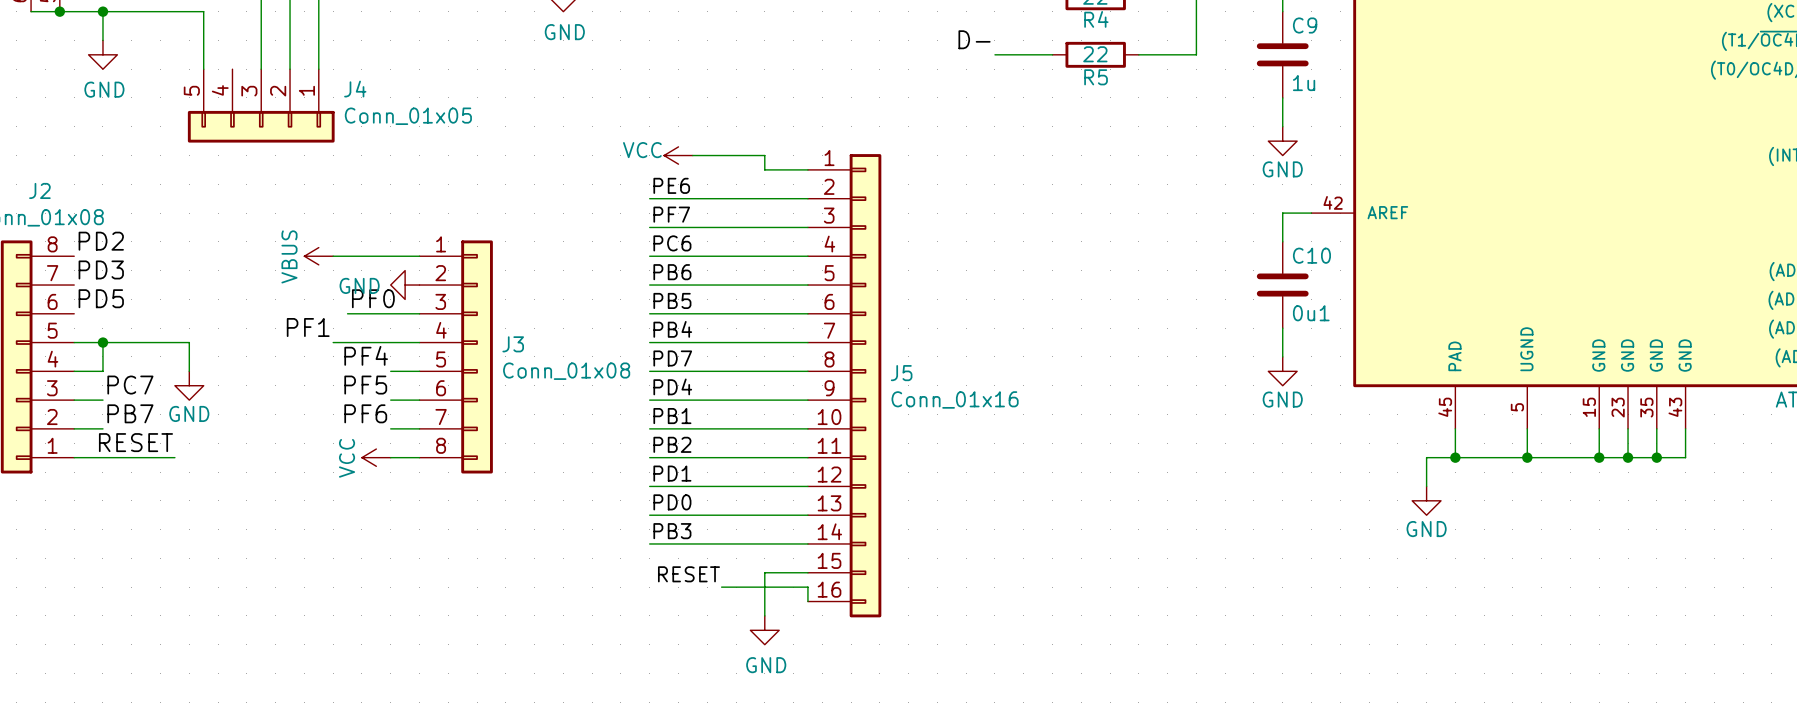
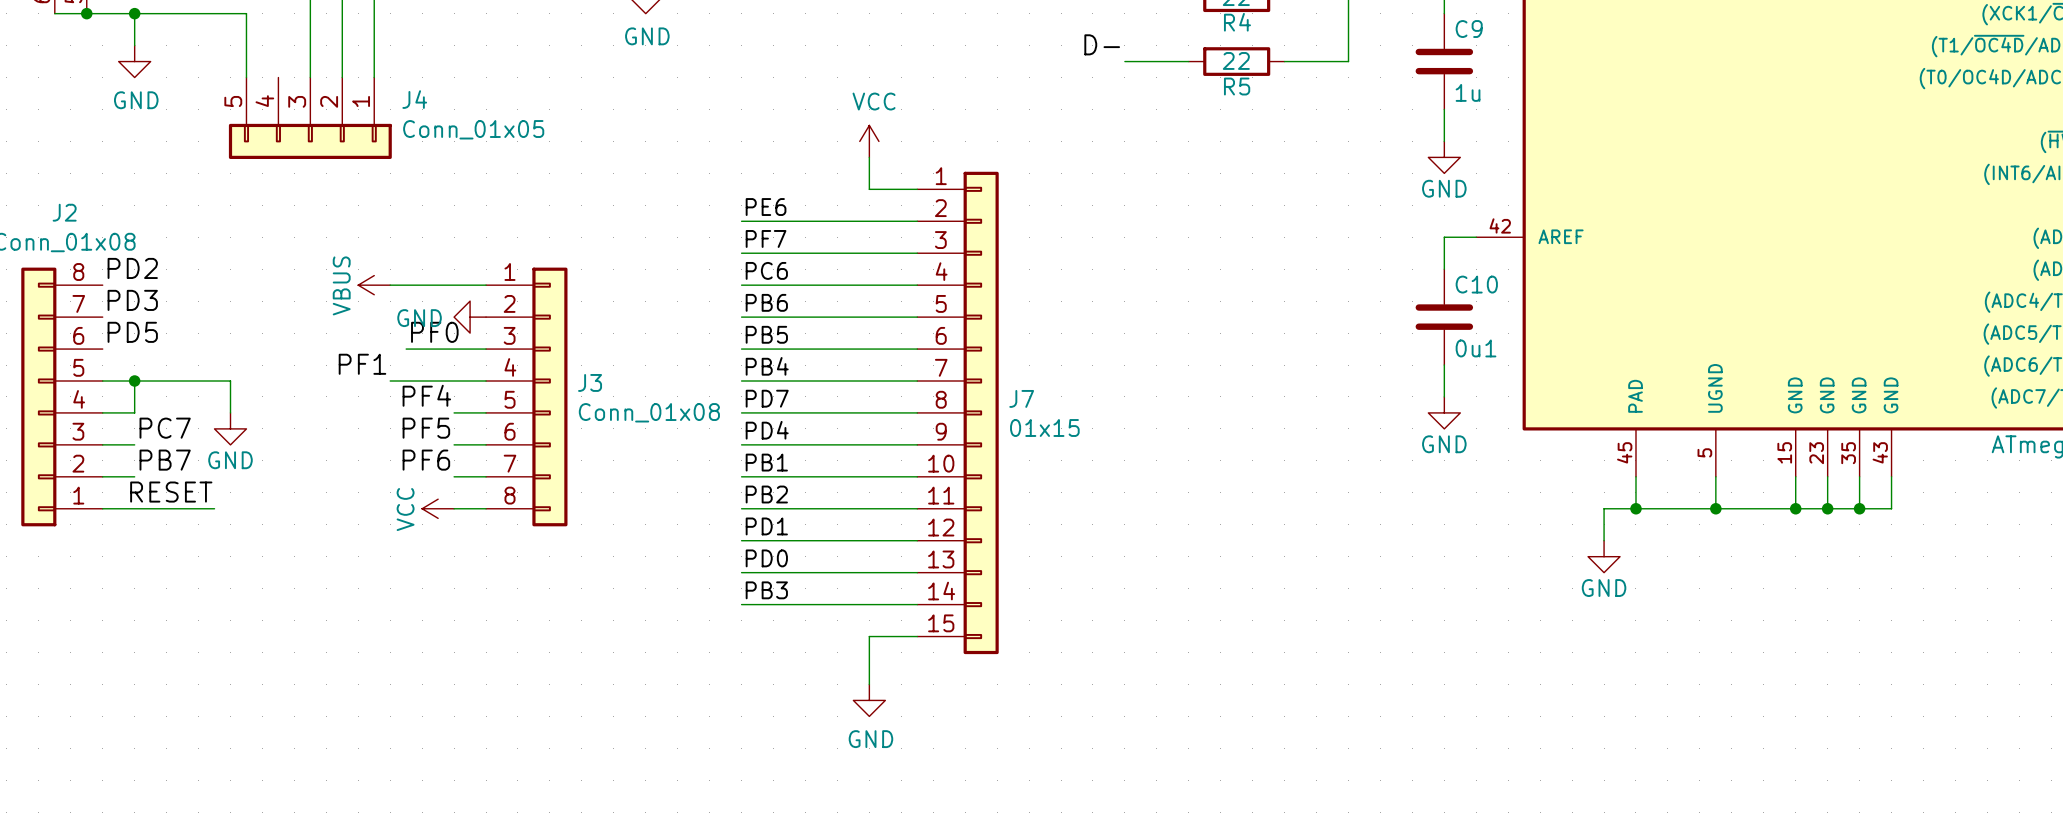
power symbol rotation: 0° (678, 155) -> 90° clockwise (869, 141)
power symbol position: VCC (678, 155) -> VCC (869, 141)
wire: (692, 155) (764, 155) -> (869, 157) (869, 173)
J7: none -> 01x15 (958, 412)
J5: Conn_01x16 (844, 385) -> none
label: RESET (688, 574) -> none
wire: (721, 587) (807, 587) (807, 601) -> none

